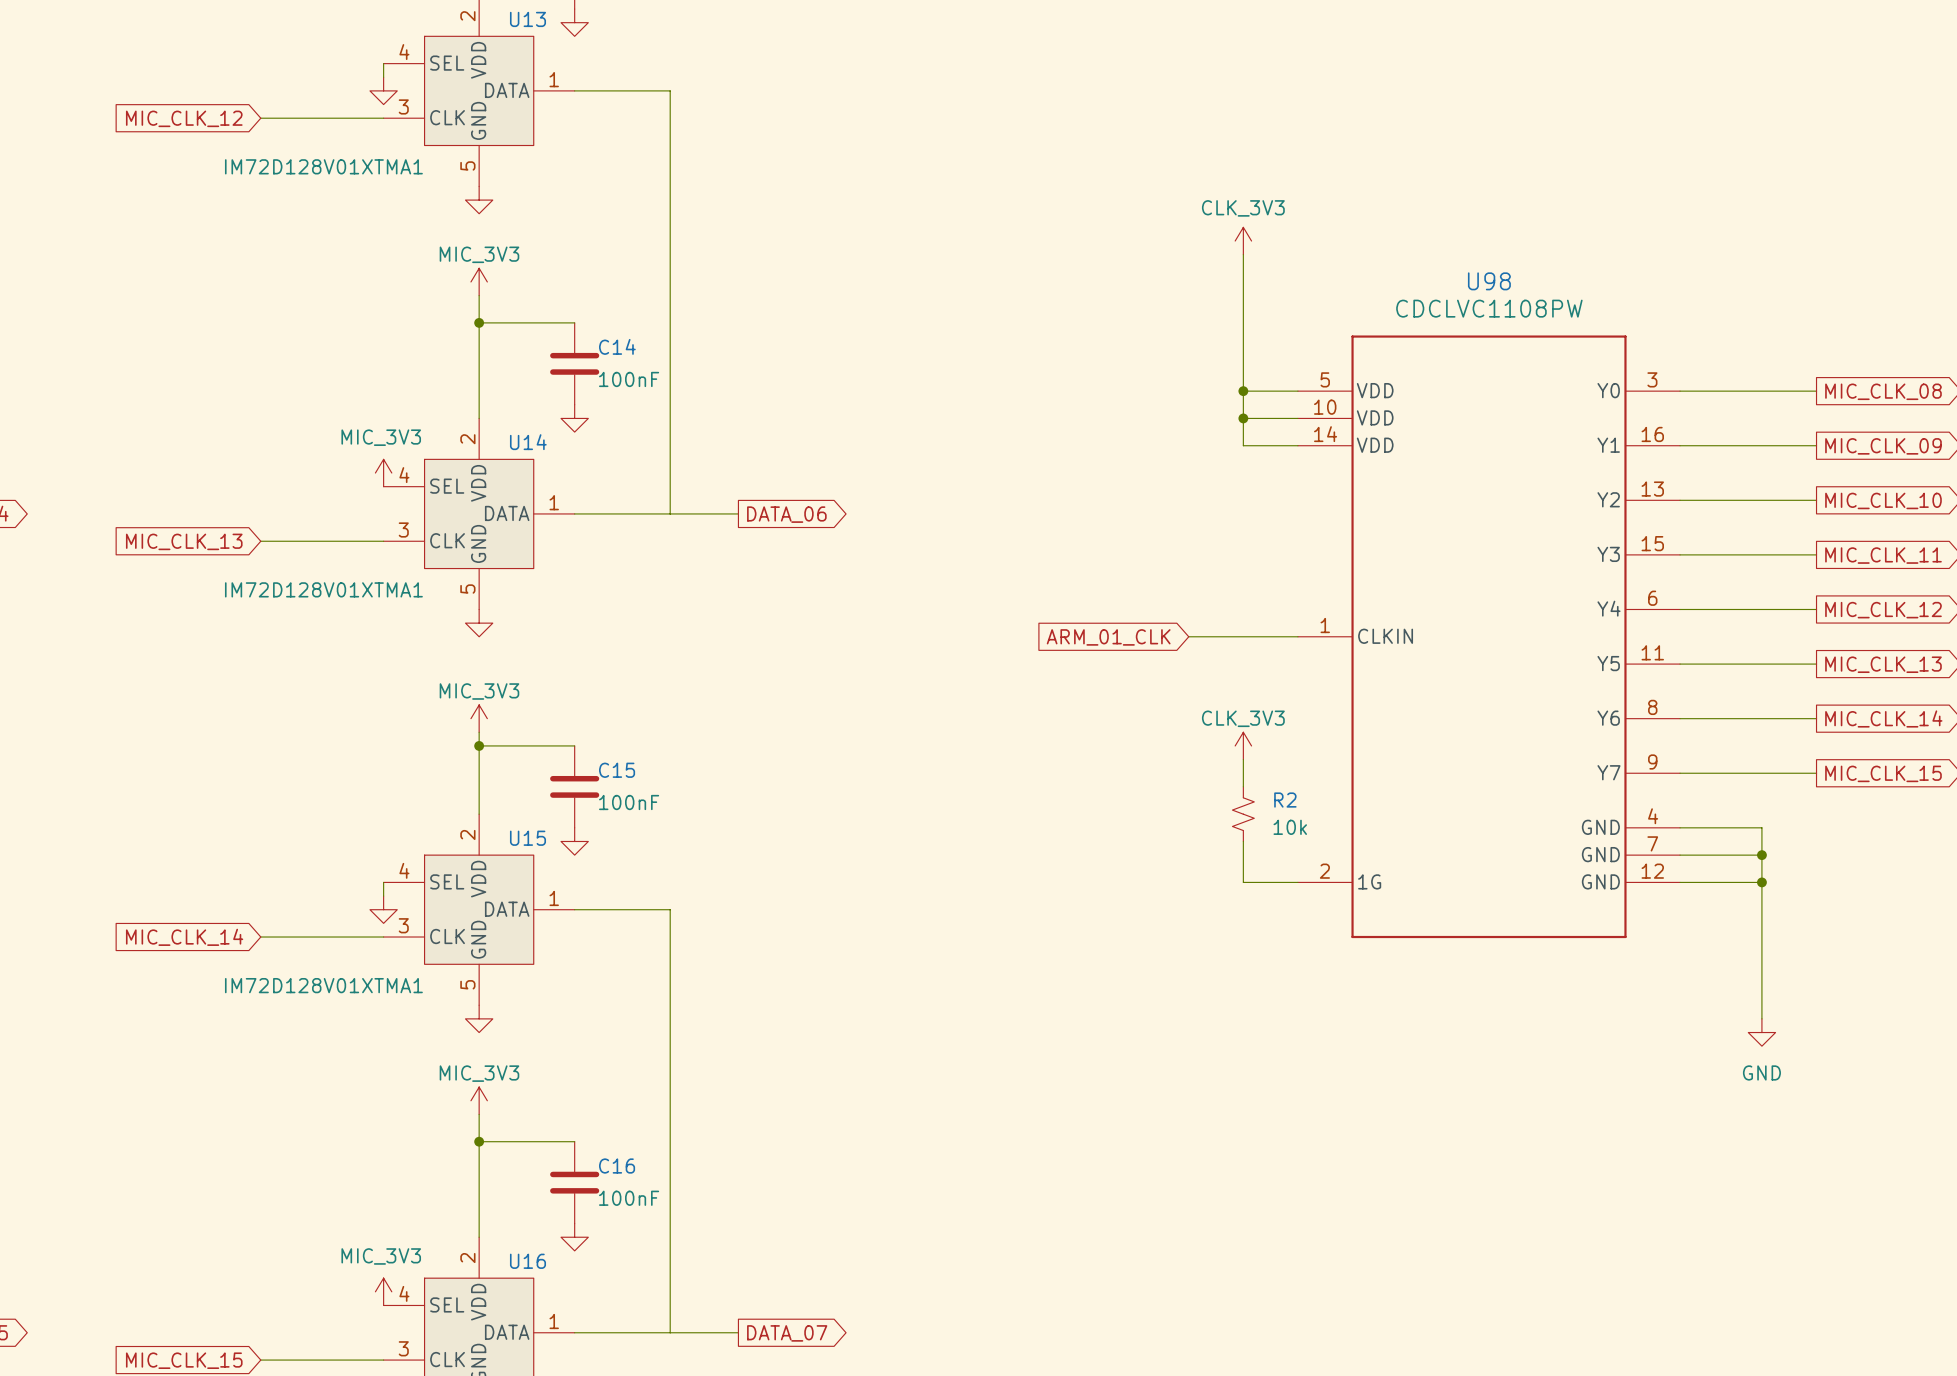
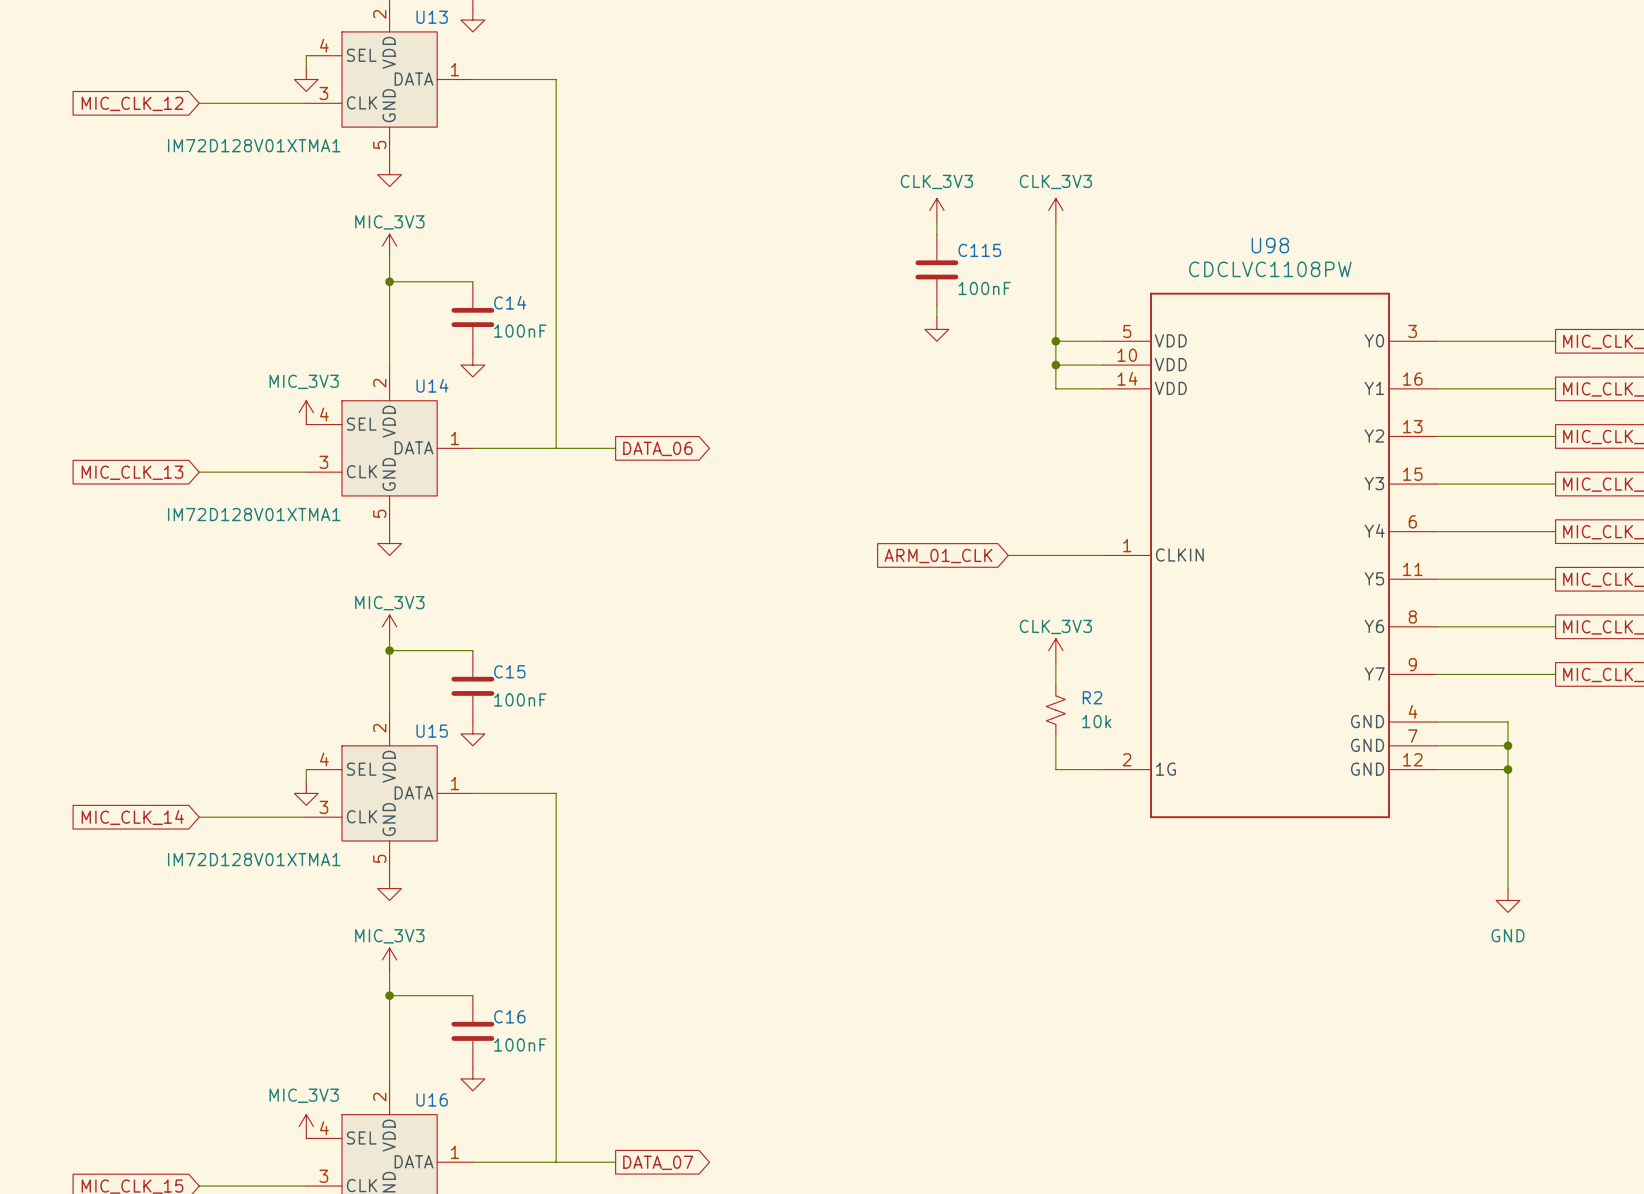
power symbol: none -> CLK_3V3 (936, 210)
wire: none -> (936, 222) (936, 234)
C115: none -> 100nF (936, 269)
wire: none -> (936, 305) (936, 317)
power symbol: none -> (936, 329)

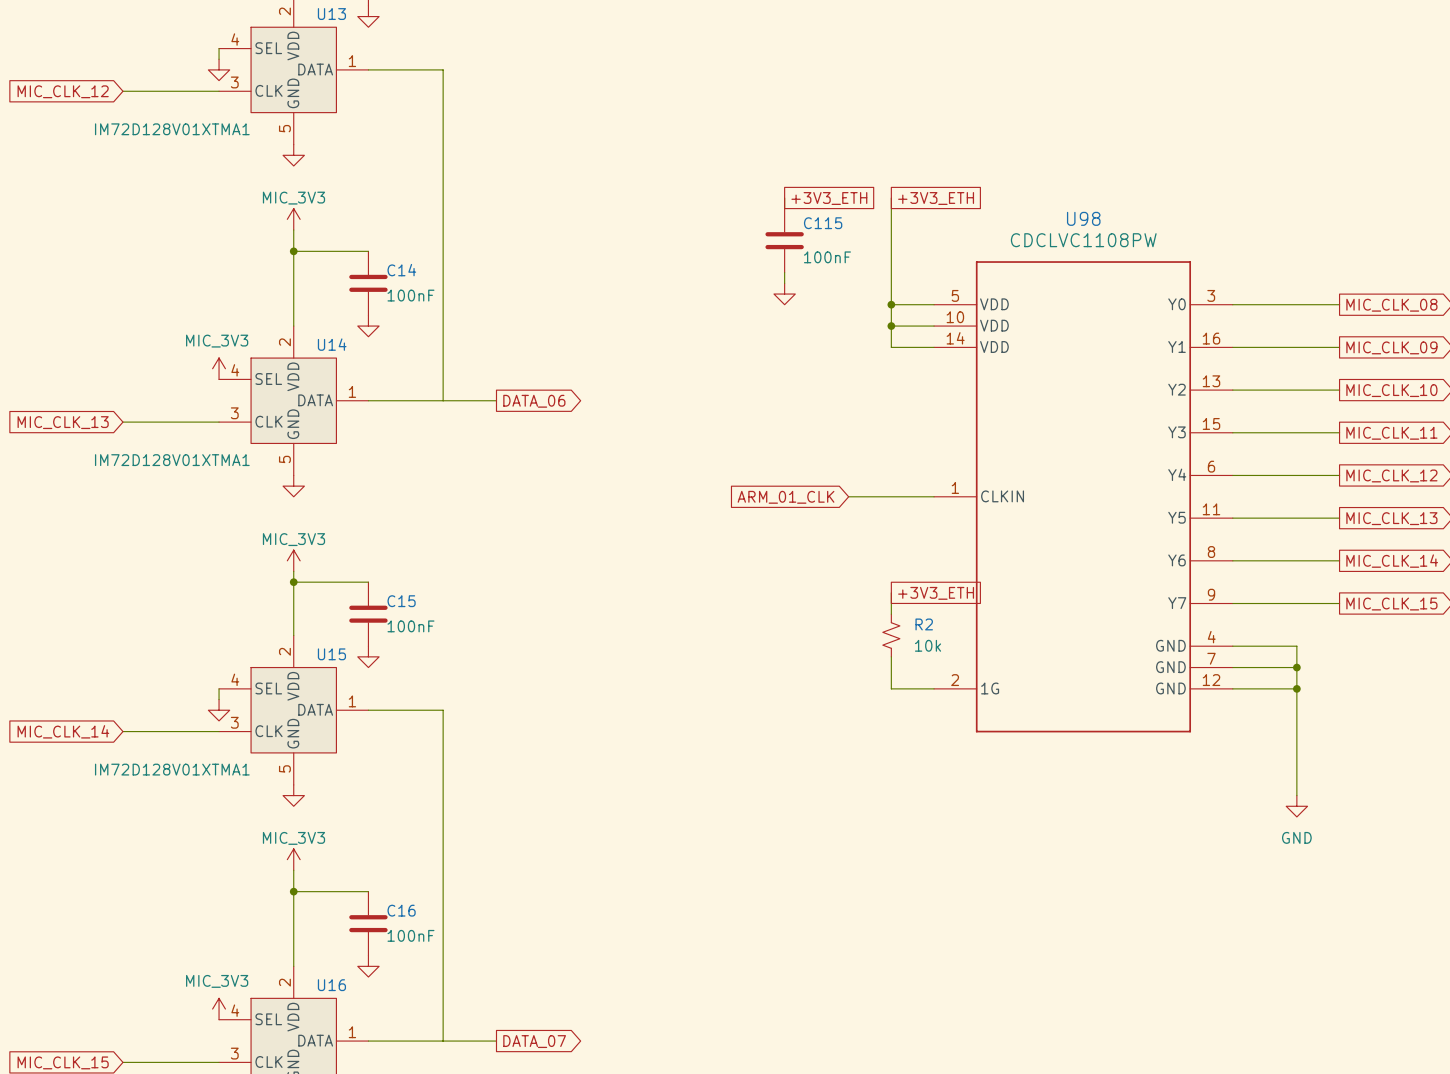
power symbol: CLK_3V3 (936, 210) -> none
power symbol: CLK_3V3 (1055, 210) -> none
global label: none -> +3V3_ETH (829, 198)
global label: none -> +3V3_ETH (936, 198)
power symbol: CLK_3V3 (1055, 650) -> none
global label: none -> +3V3_ETH (936, 593)

